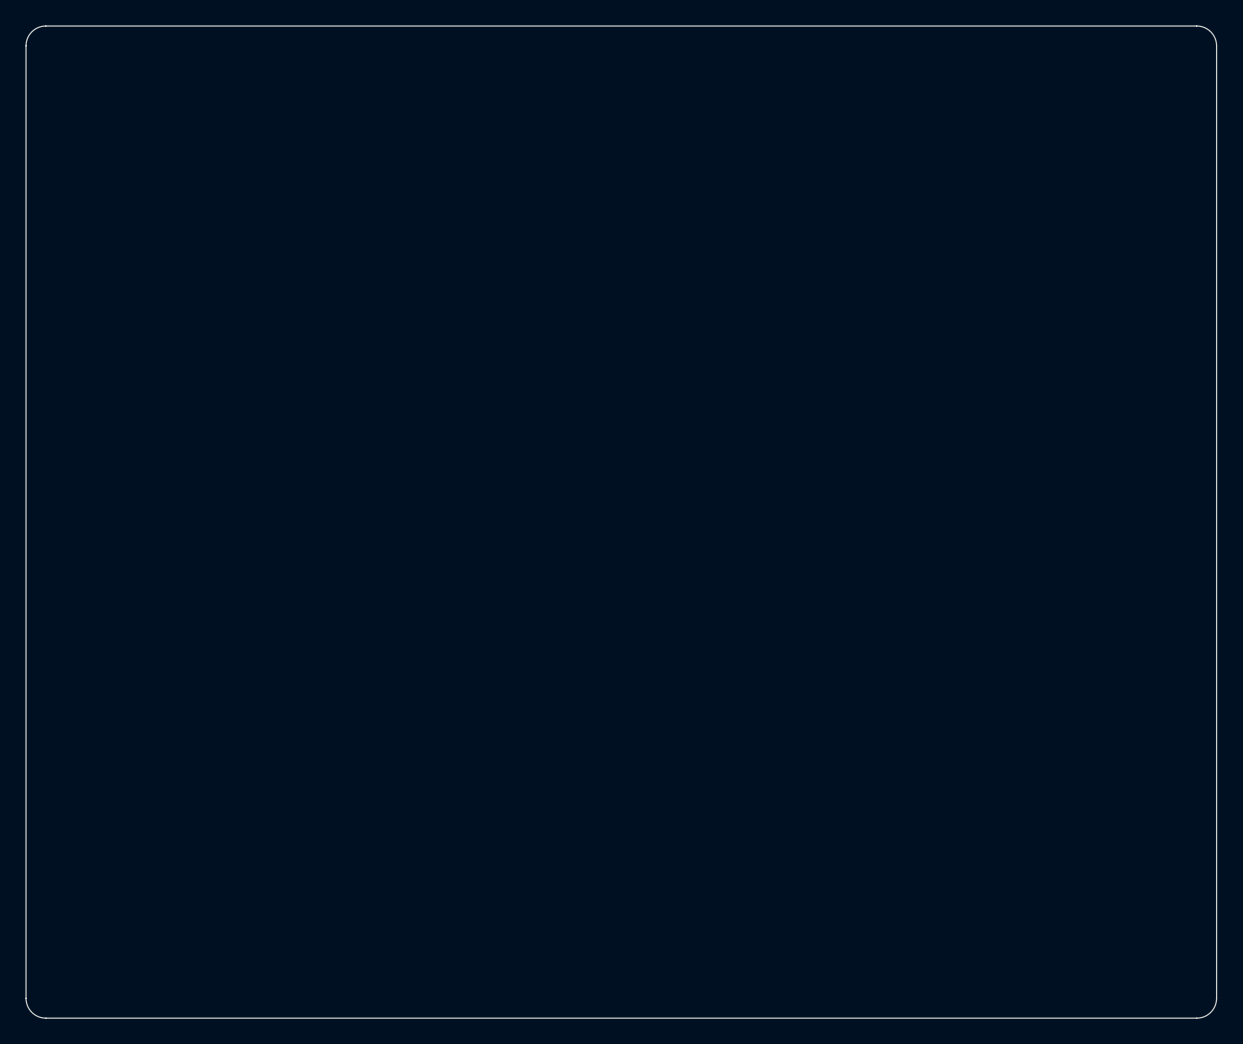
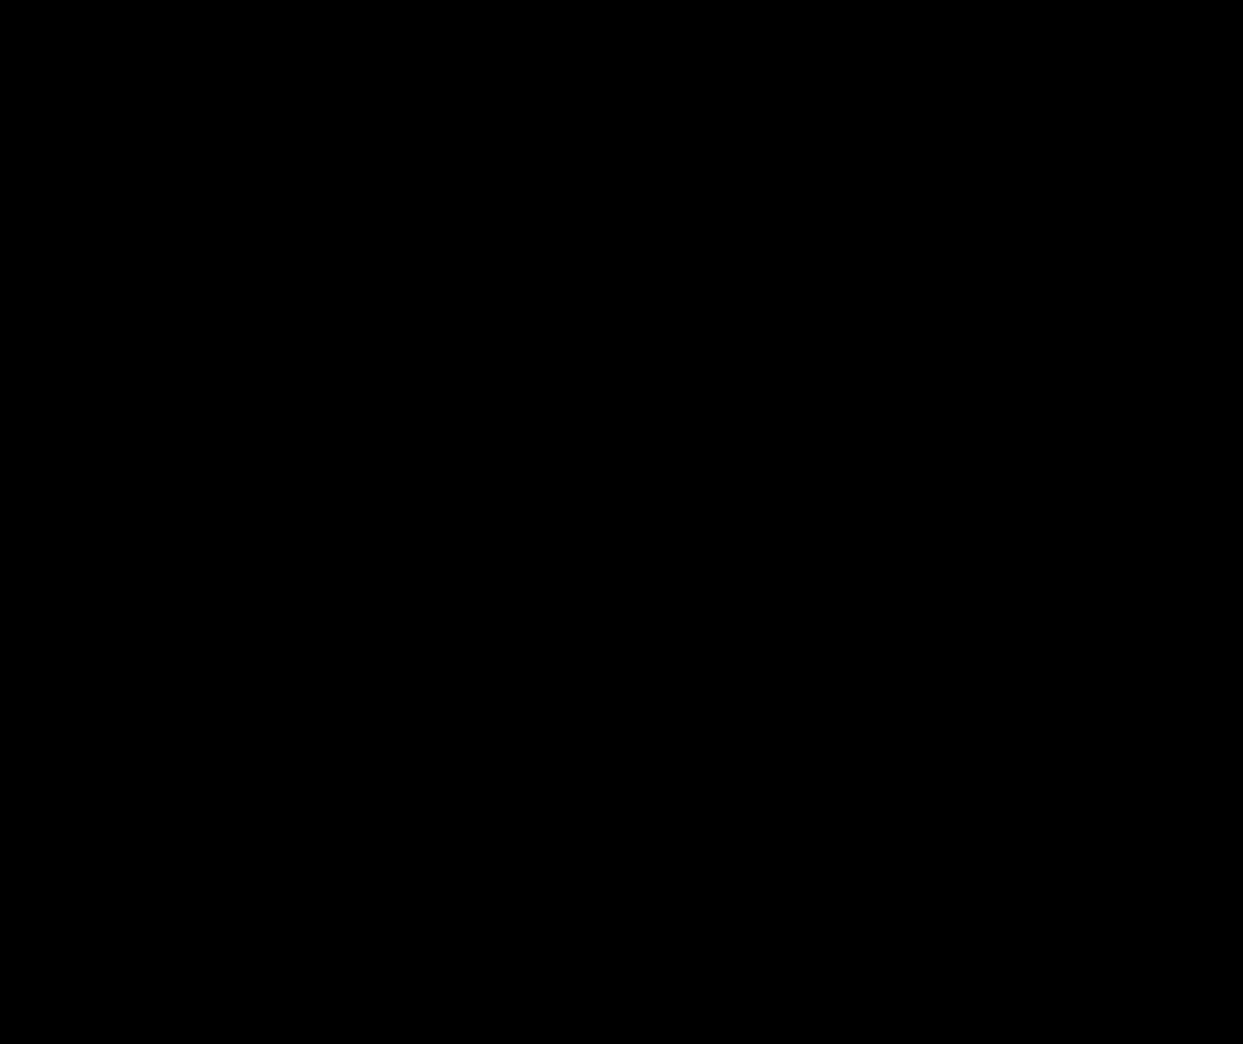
board edge: (45, 26) (1196, 26) (1209, 30) (1214, 37) (1216, 45) (1216, 998) (1212, 1010) (1205, 1016) (1196, 1018) (45, 1018) (33, 1013) (27, 1006) (26, 998) (26, 45) (31, 31) (45, 26) -> none

